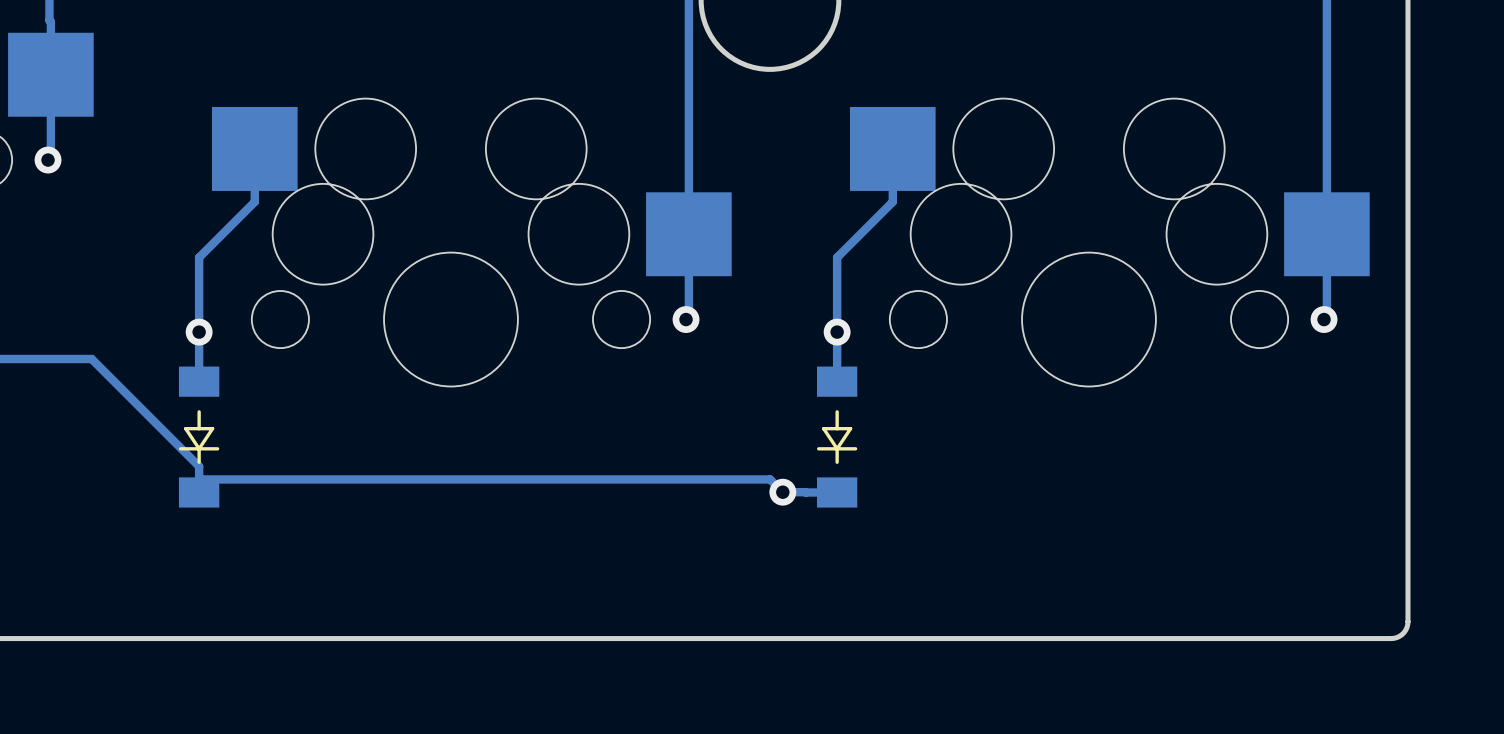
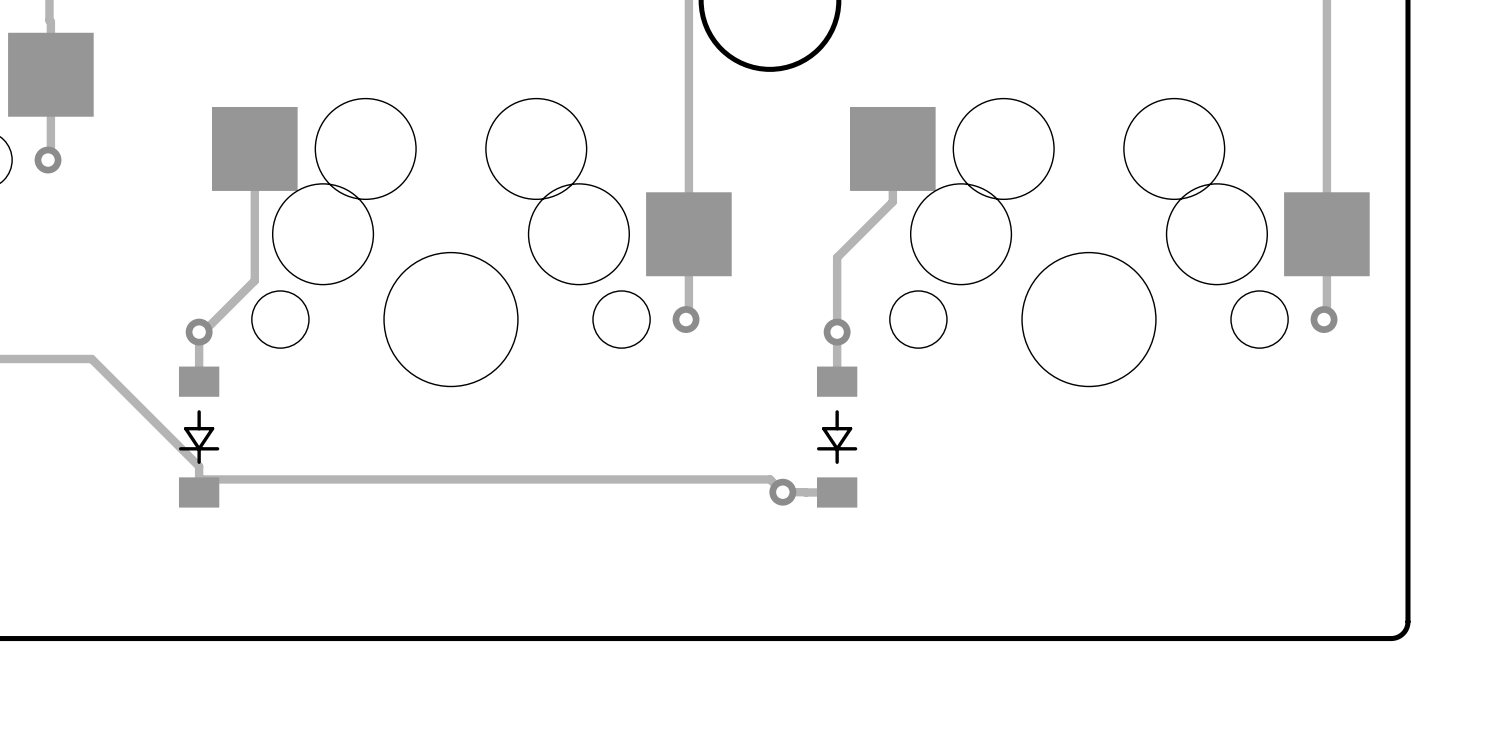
track: (254, 201) (199, 257) (199, 336) -> (254, 201) (254, 280) (199, 336)

